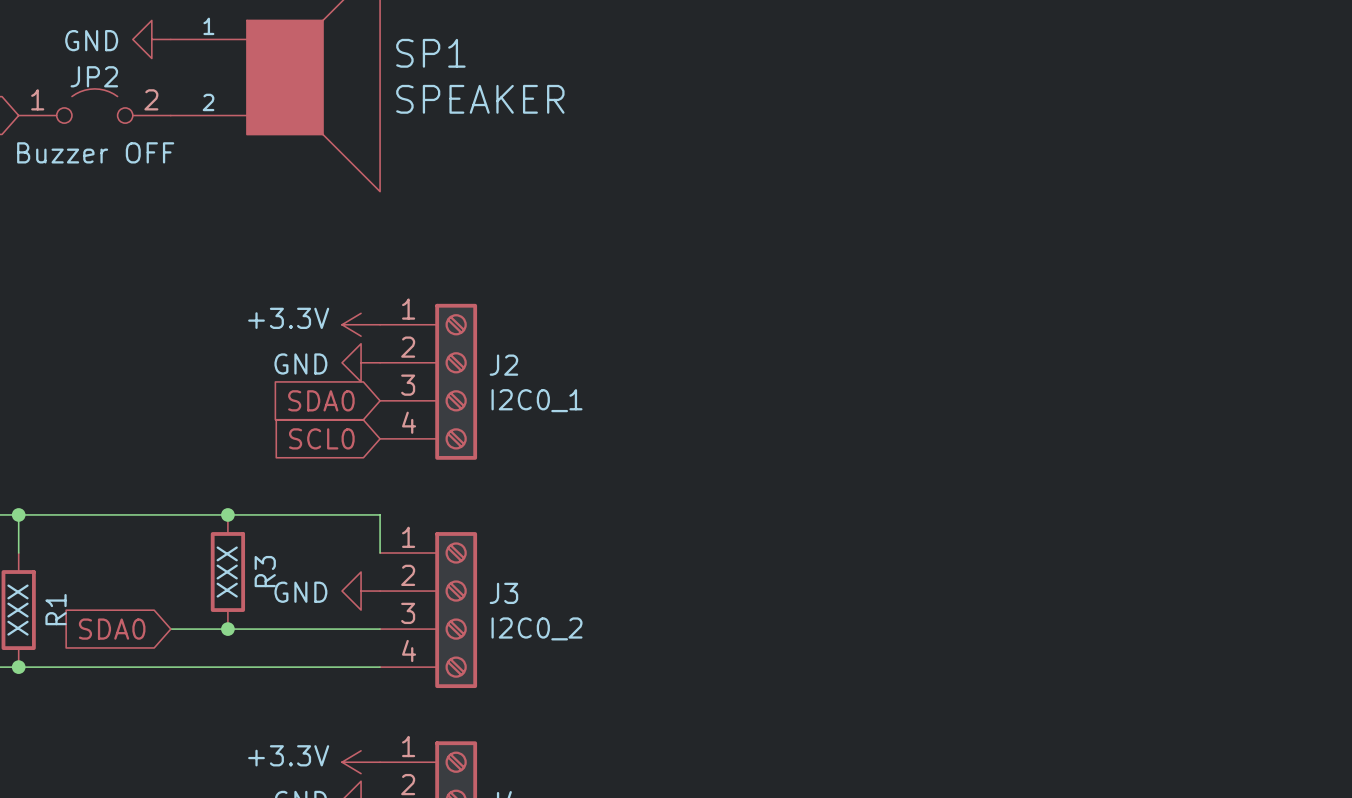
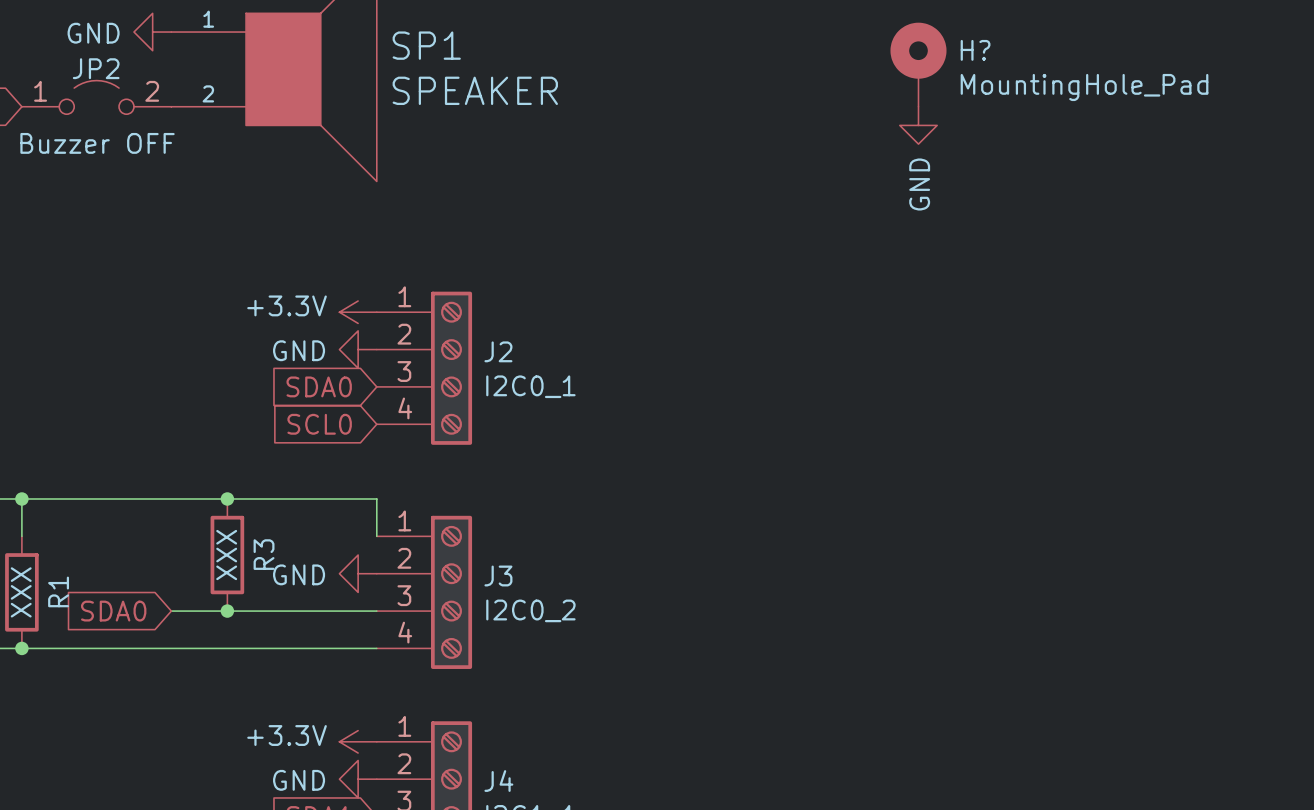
H?: none -> MountingHole_Pad (918, 64)
power symbol: none -> GND (918, 125)

